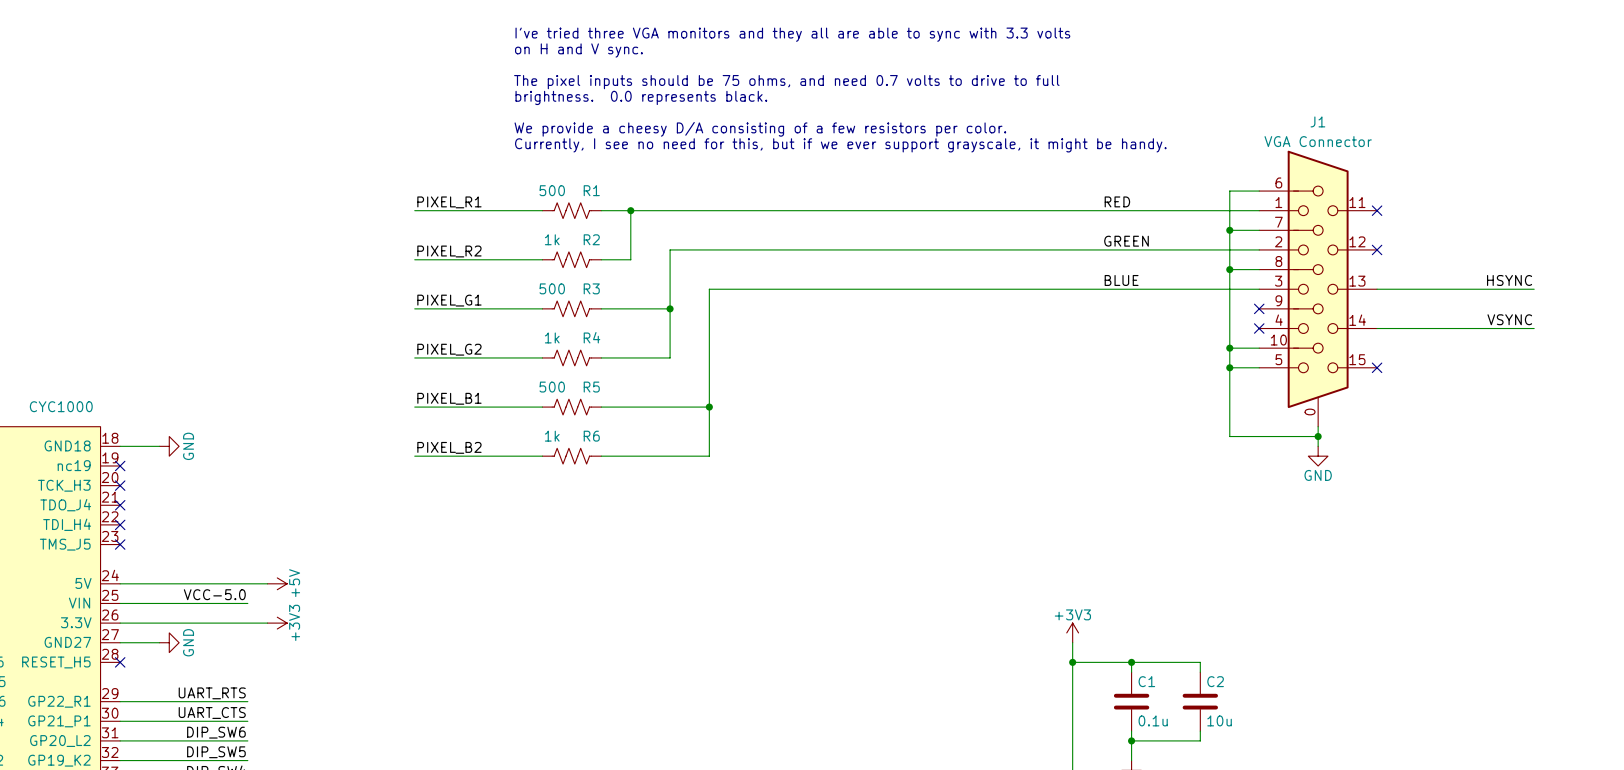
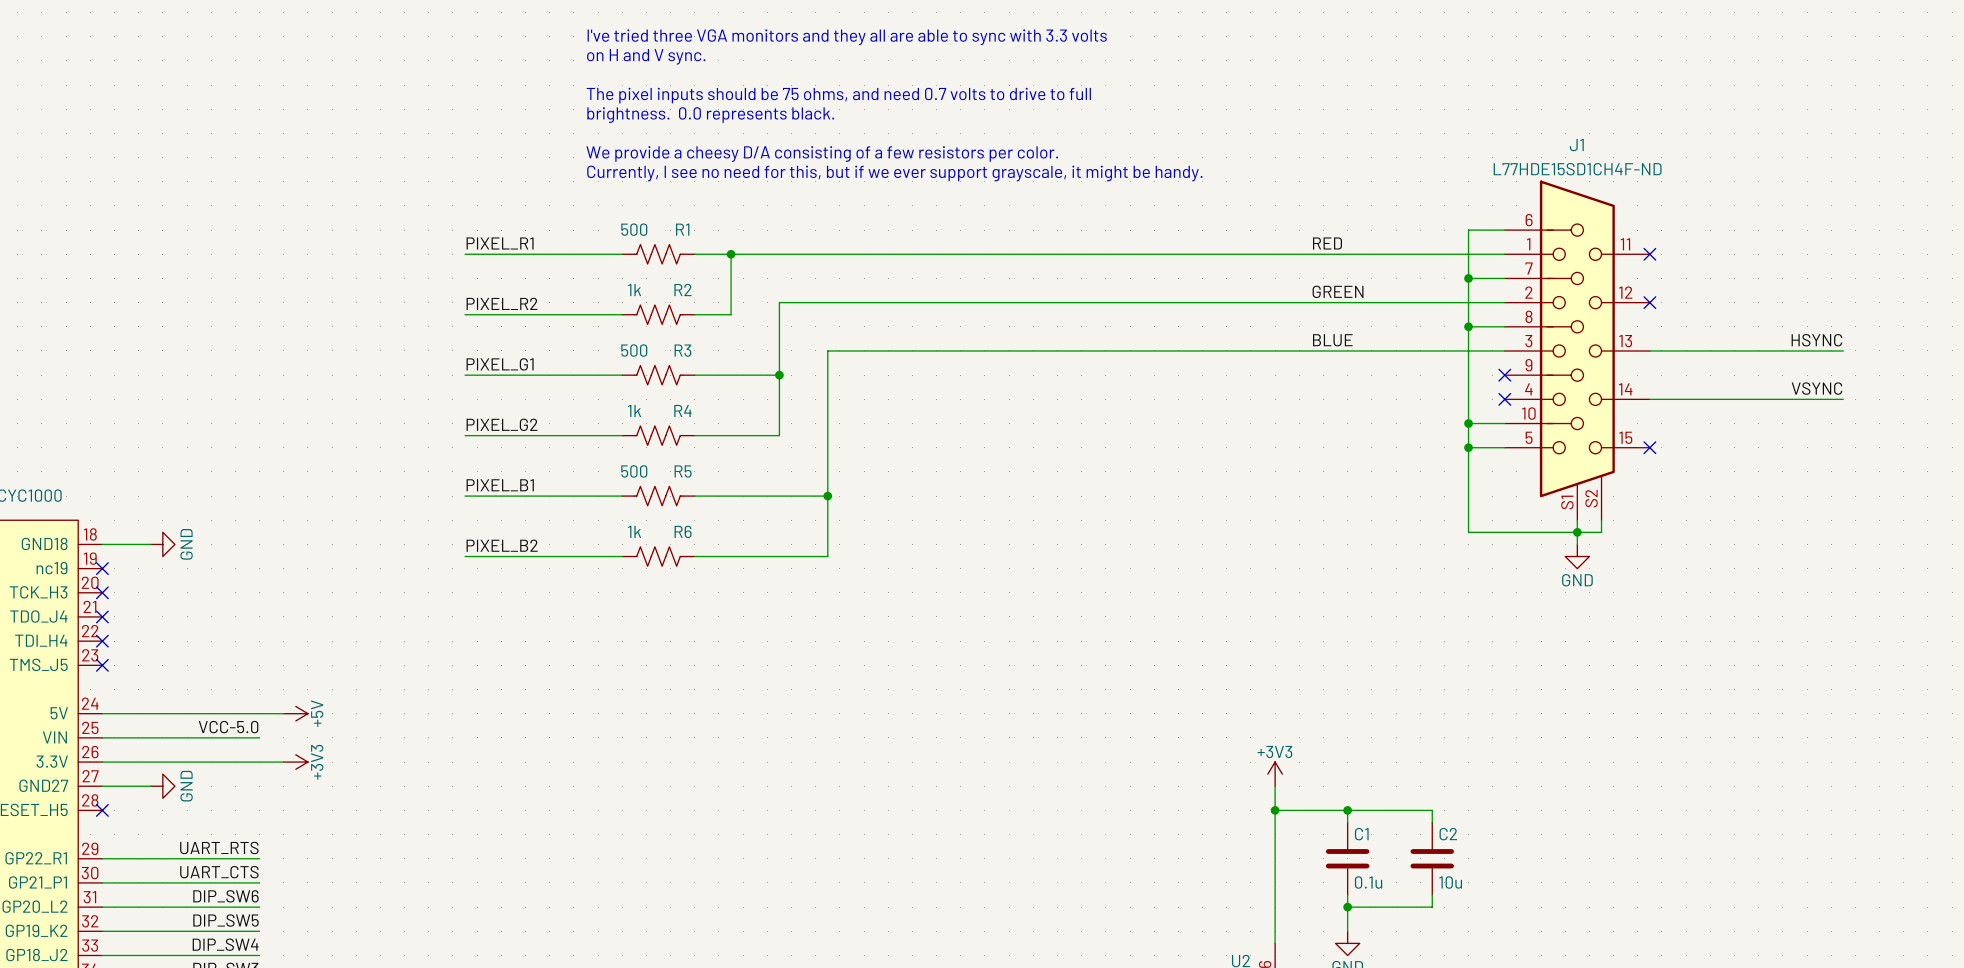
J1 value: VGA Connector (1318, 141) -> L77HDE15SD1CH4F-ND (1577, 169)
J1 symbol: [1259, 150, 1378, 427] -> [1504, 180, 1650, 521]
wire: none -> (1601, 520) (1601, 532) (1577, 532)

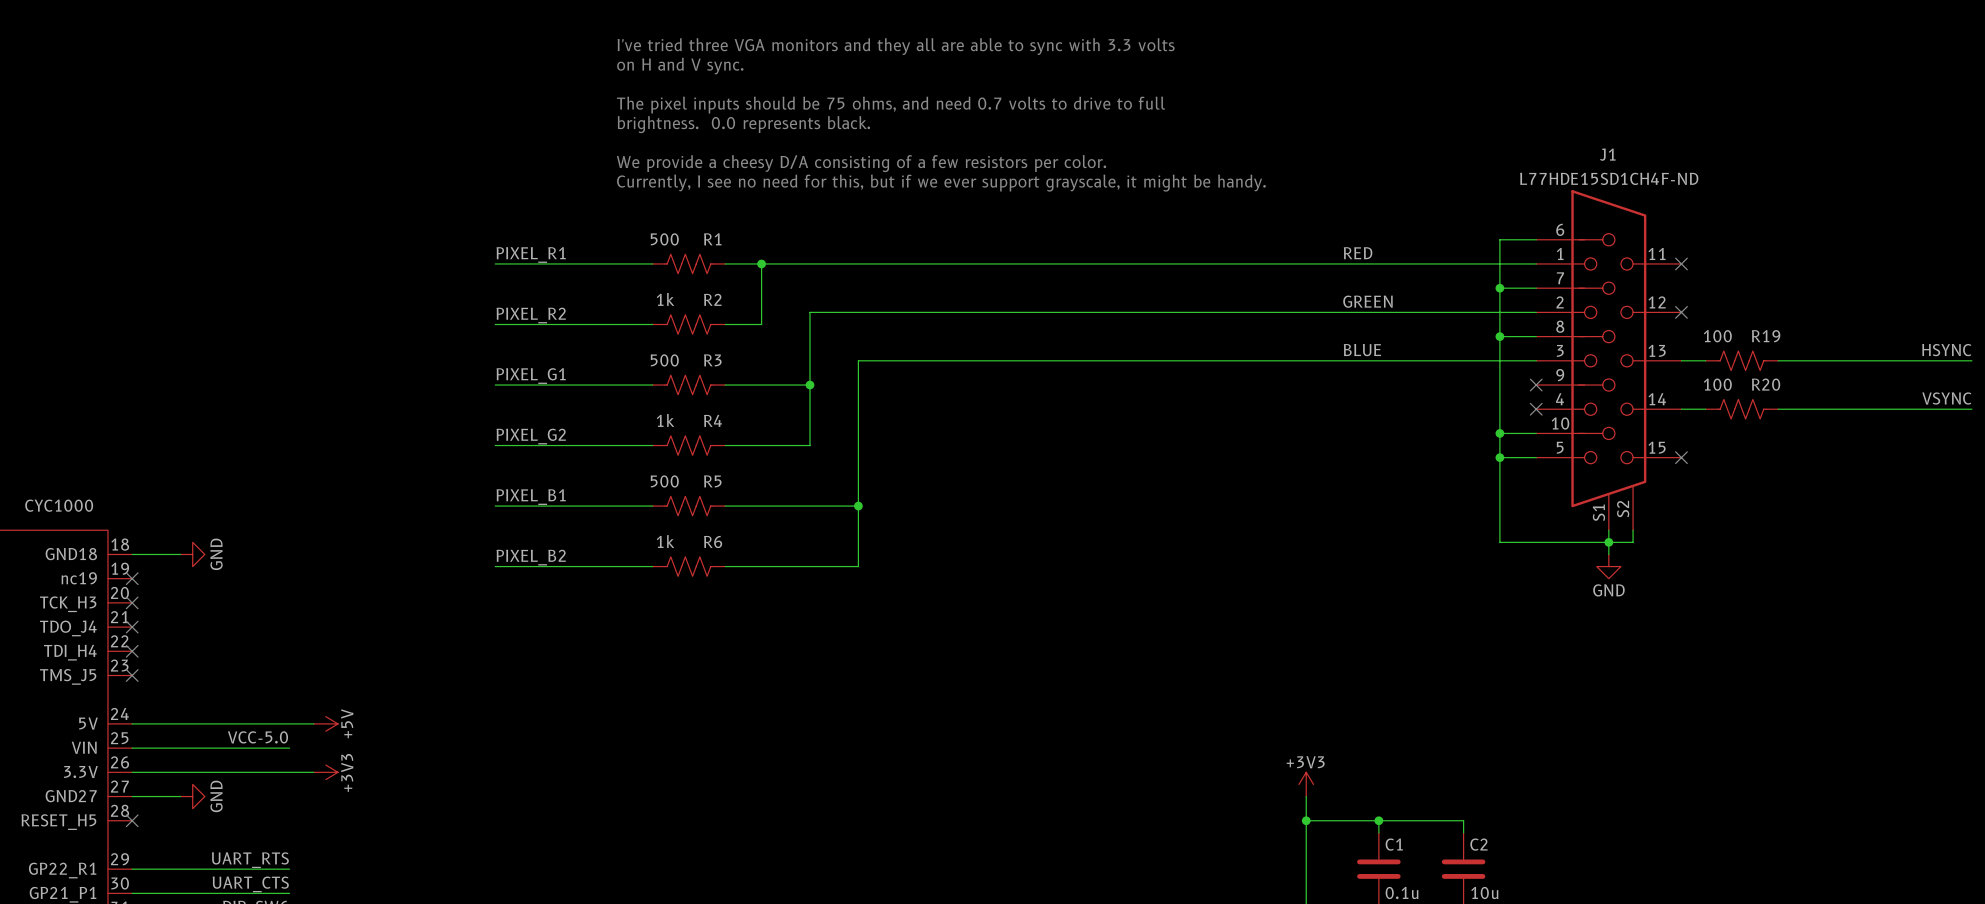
label position: HSYNC (1816, 340) -> HSYNC (1946, 350)
R19: none -> 100 (1741, 360)
wire: none -> (1875, 360) (1971, 360)
label position: VSYNC (1816, 388) -> VSYNC (1946, 398)
R20: none -> 100 (1741, 409)
wire: none -> (1875, 409) (1971, 409)

